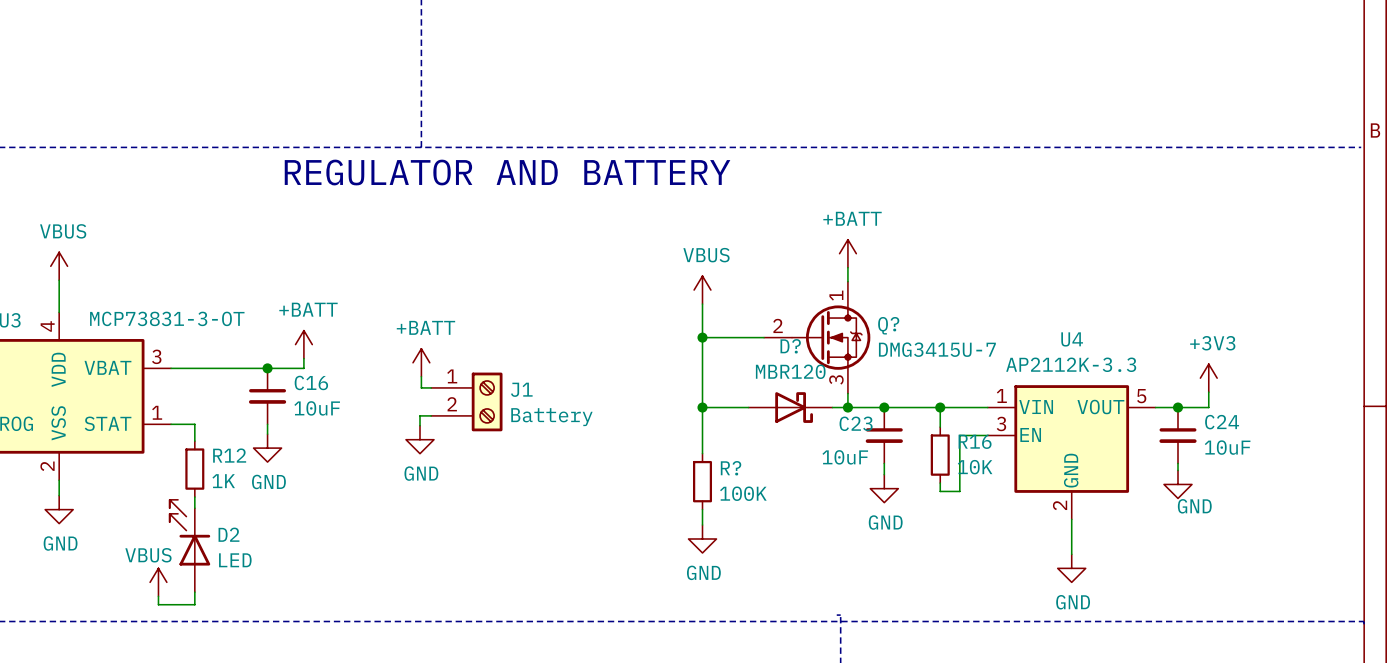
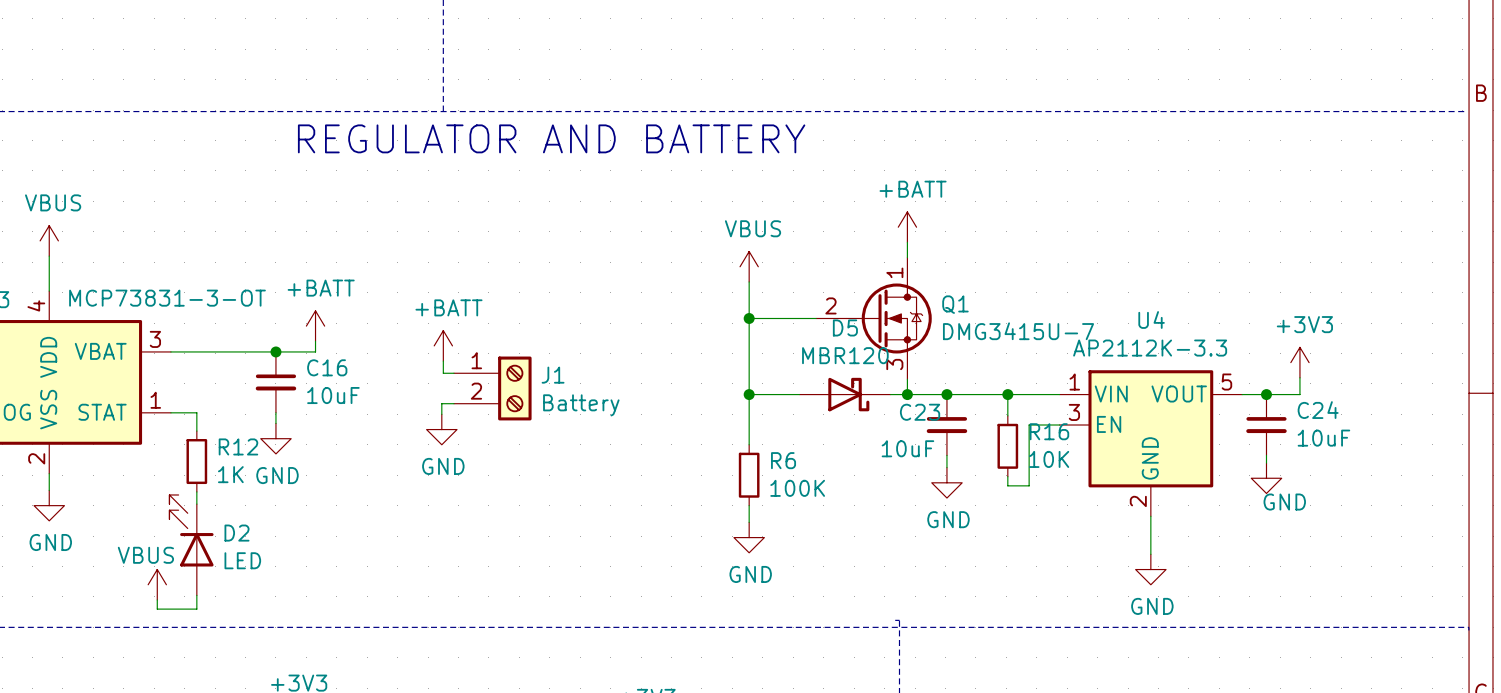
Q? name: Q? (888, 325) -> Q1 (955, 304)
D? name: D? (790, 346) -> D5 (845, 327)
R? name: R? (731, 468) -> R6 (783, 460)

